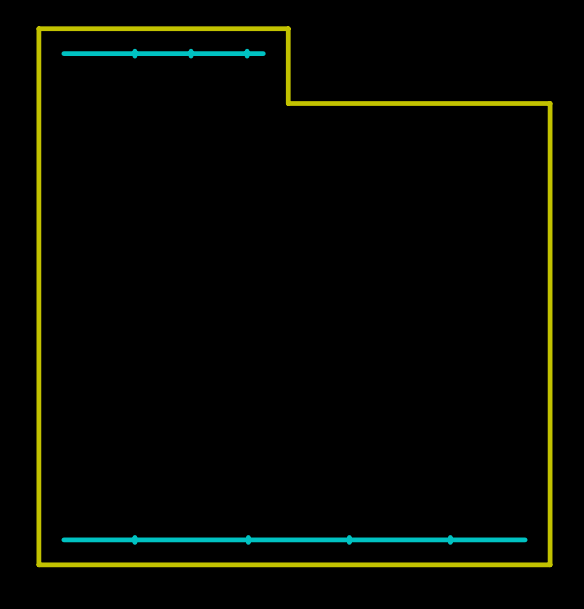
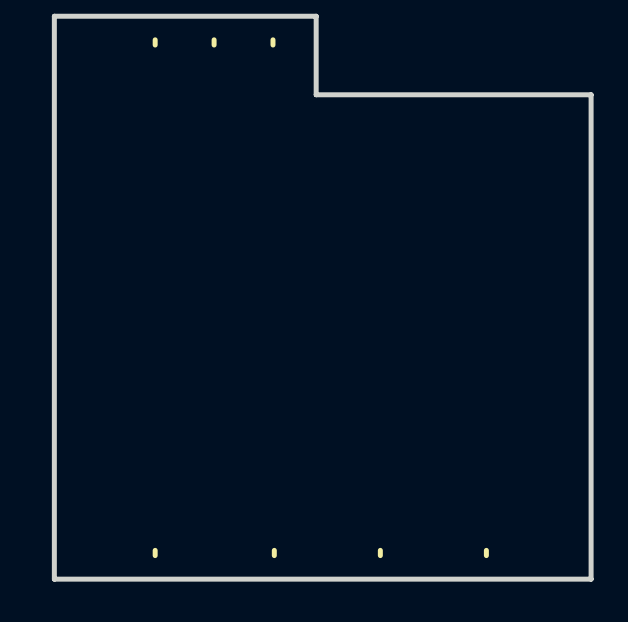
line: (63, 53) (263, 53) -> none
line: (63, 539) (525, 539) -> none

